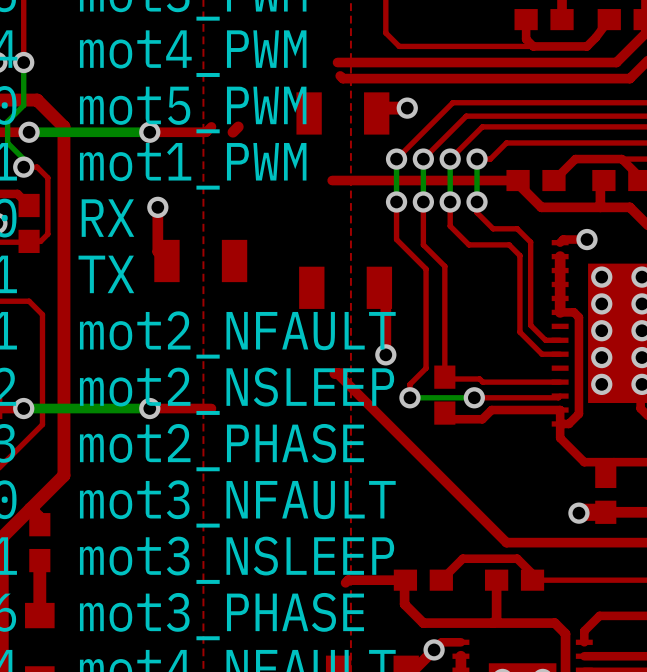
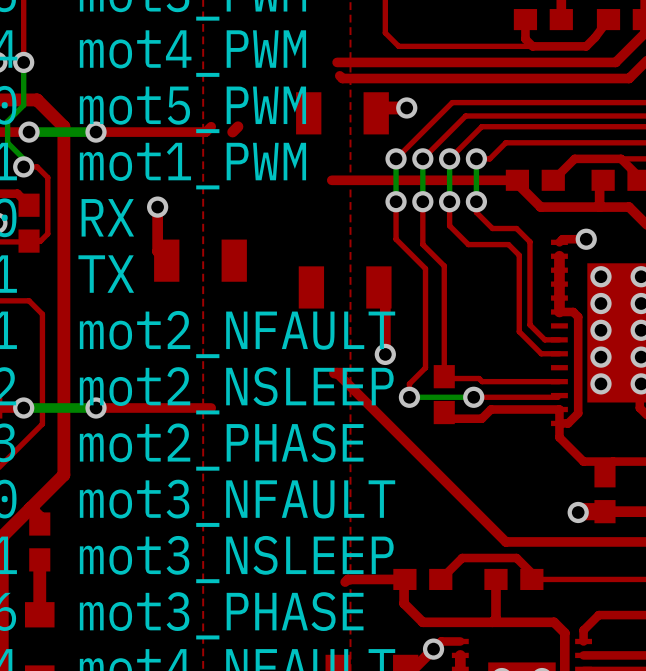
top track: none -> (149, 132) (96, 132)
bottom track: (149, 132) (96, 132) -> none
via position: (149, 132) -> (96, 132)
top track: none -> (149, 408) (96, 408)
bottom track: (149, 408) (96, 408) -> none
via position: (149, 408) -> (96, 408)

